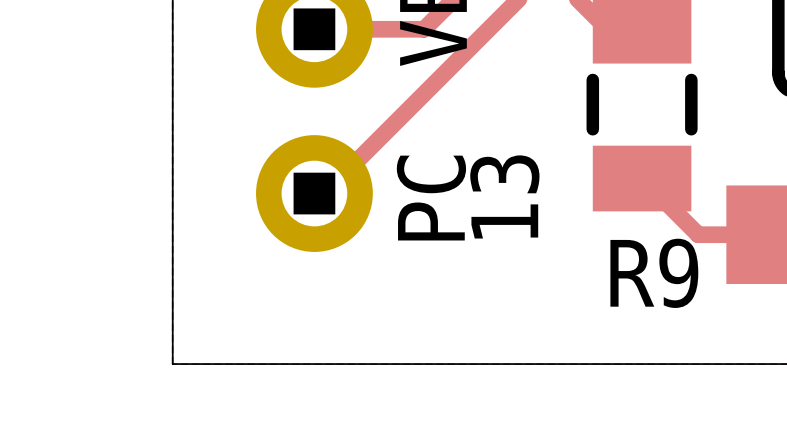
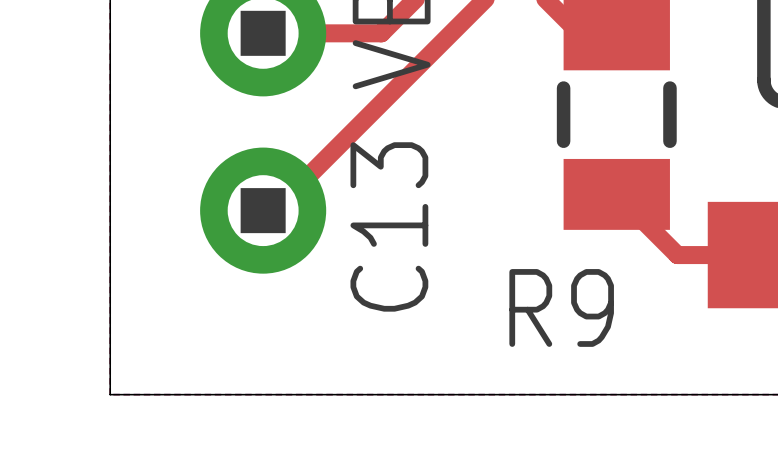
text: 13 (504, 196) -> none
text: PC (431, 198) -> C13 (389, 226)
R9 name position: R9 (654, 273) -> R9 (561, 307)

